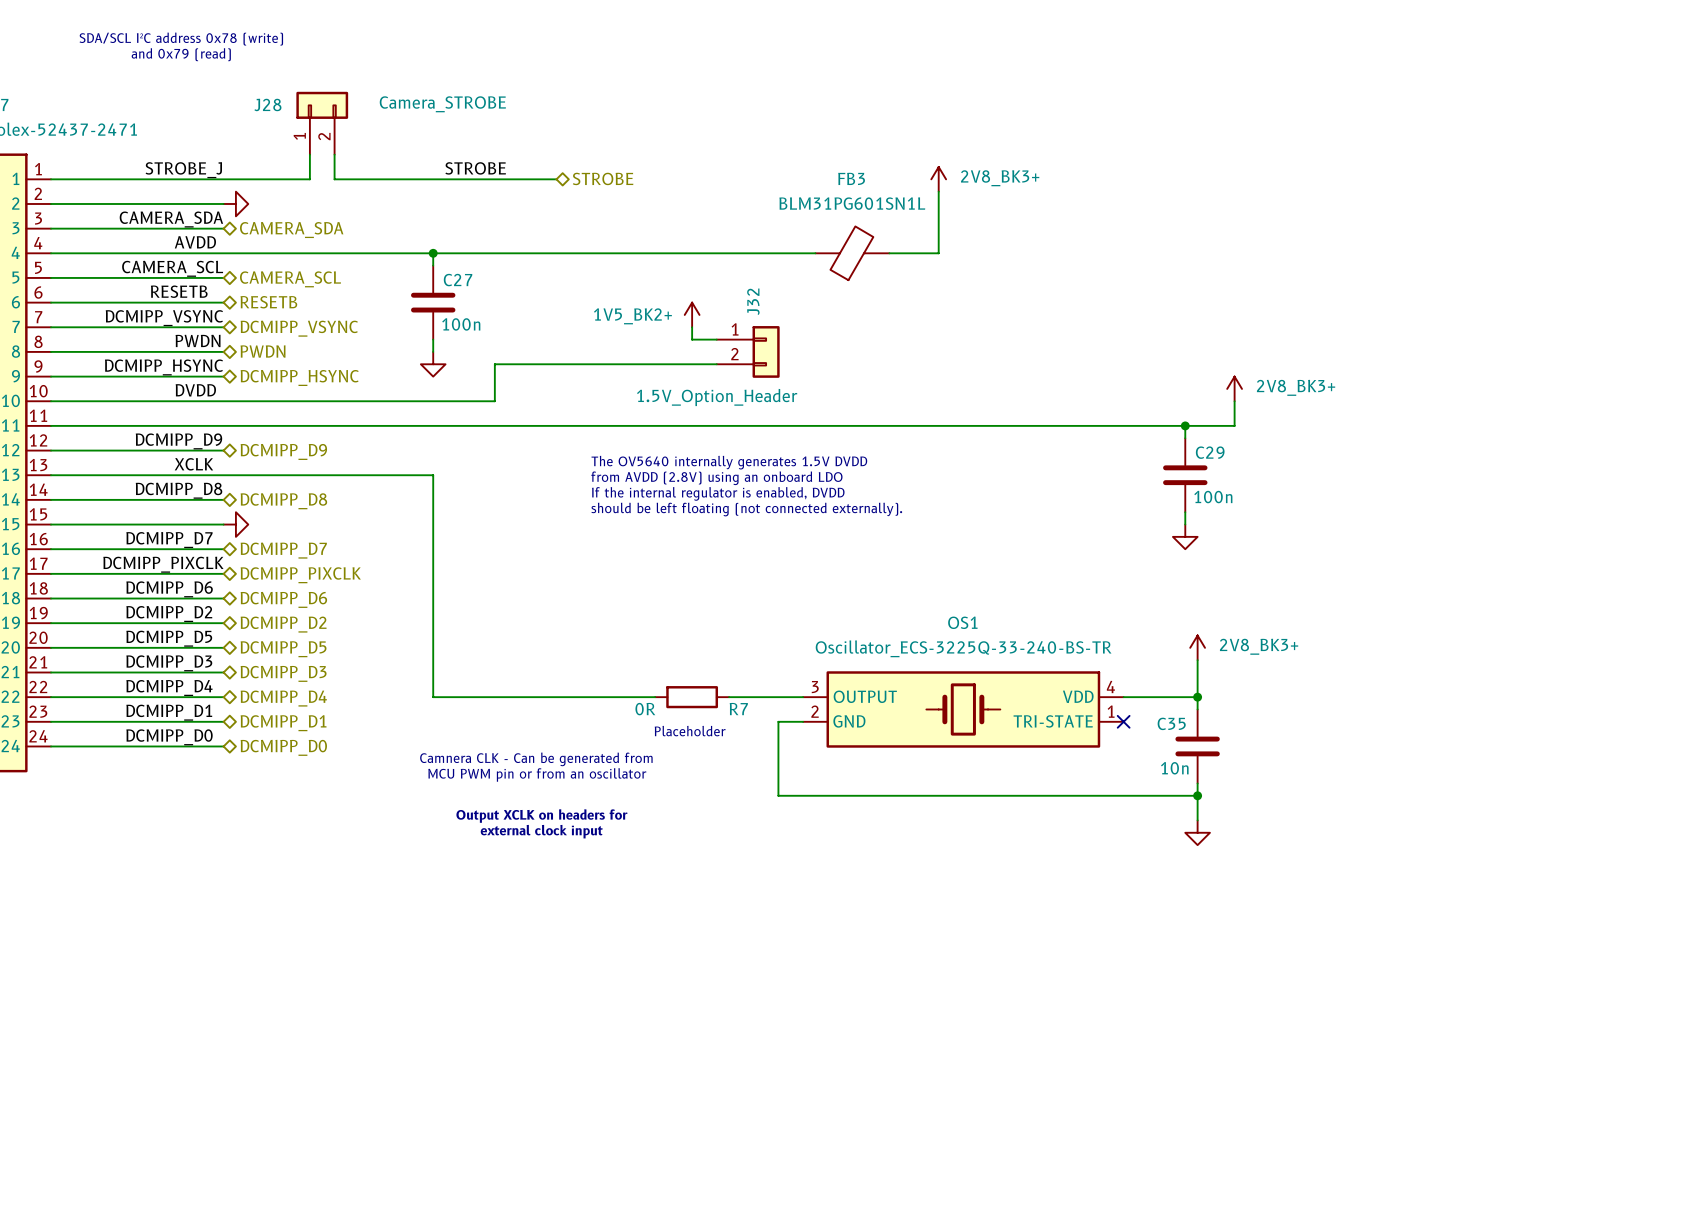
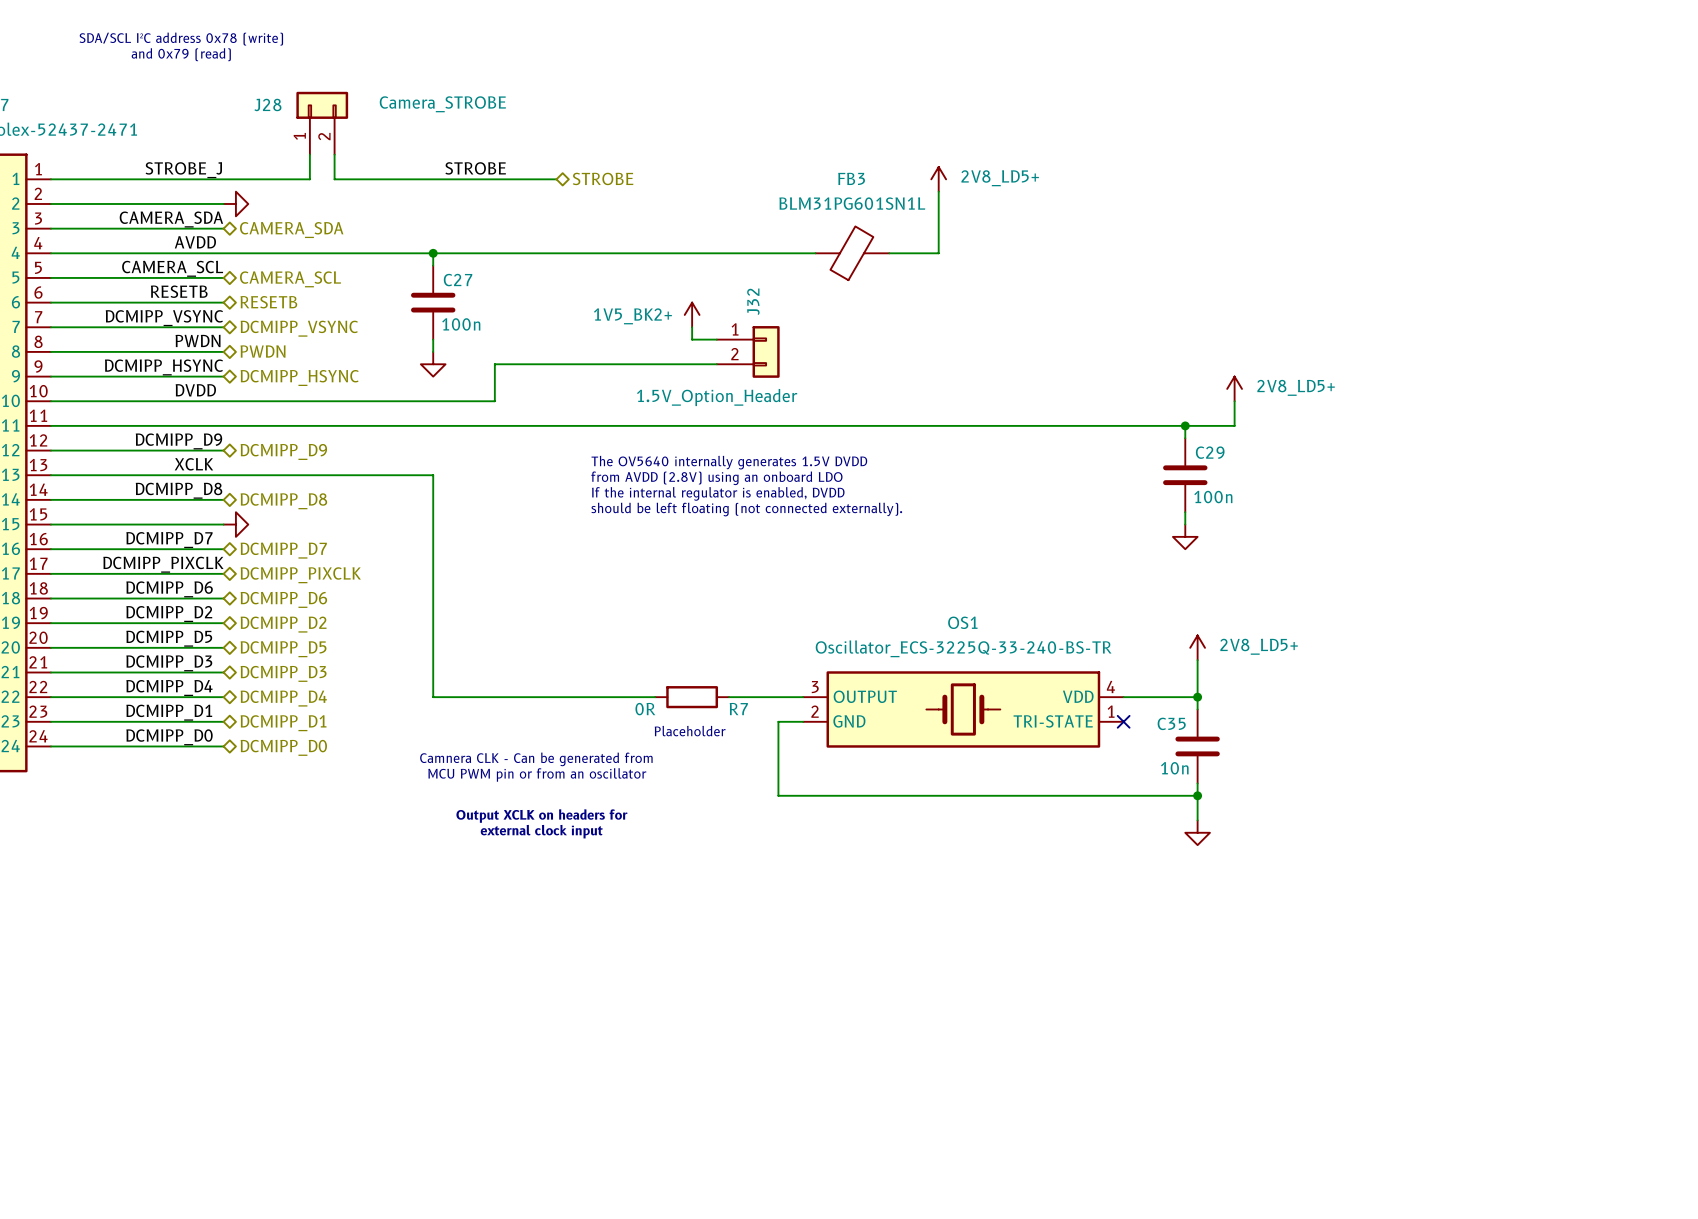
power symbol: 2V8_BK3+ (938, 179) -> 2V8_LD5+ (938, 179)
power symbol: 2V8_BK3+ (1234, 388) -> 2V8_LD5+ (1234, 388)
power symbol: 2V8_BK3+ (1197, 647) -> 2V8_LD5+ (1197, 647)

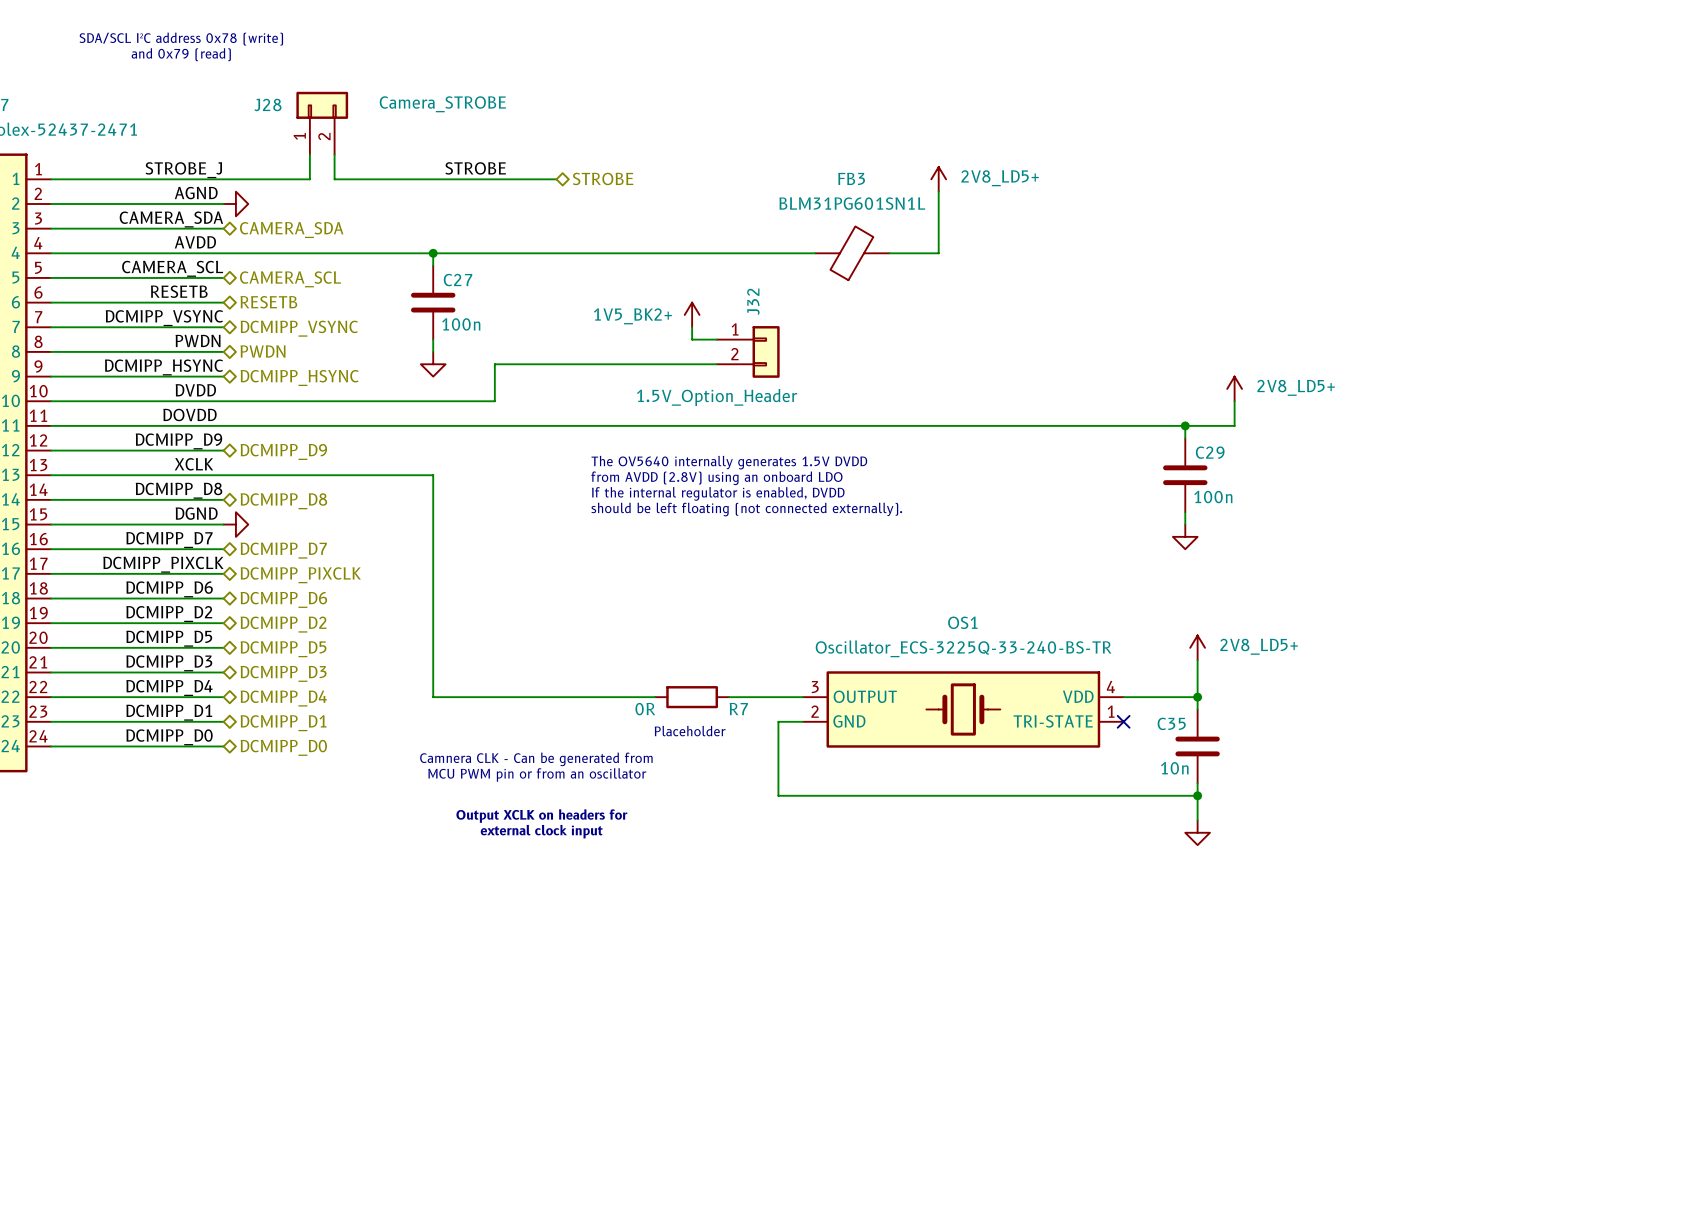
label: none -> AGND (196, 193)
label: none -> DOVDD (189, 414)
label: none -> DGND (196, 513)

